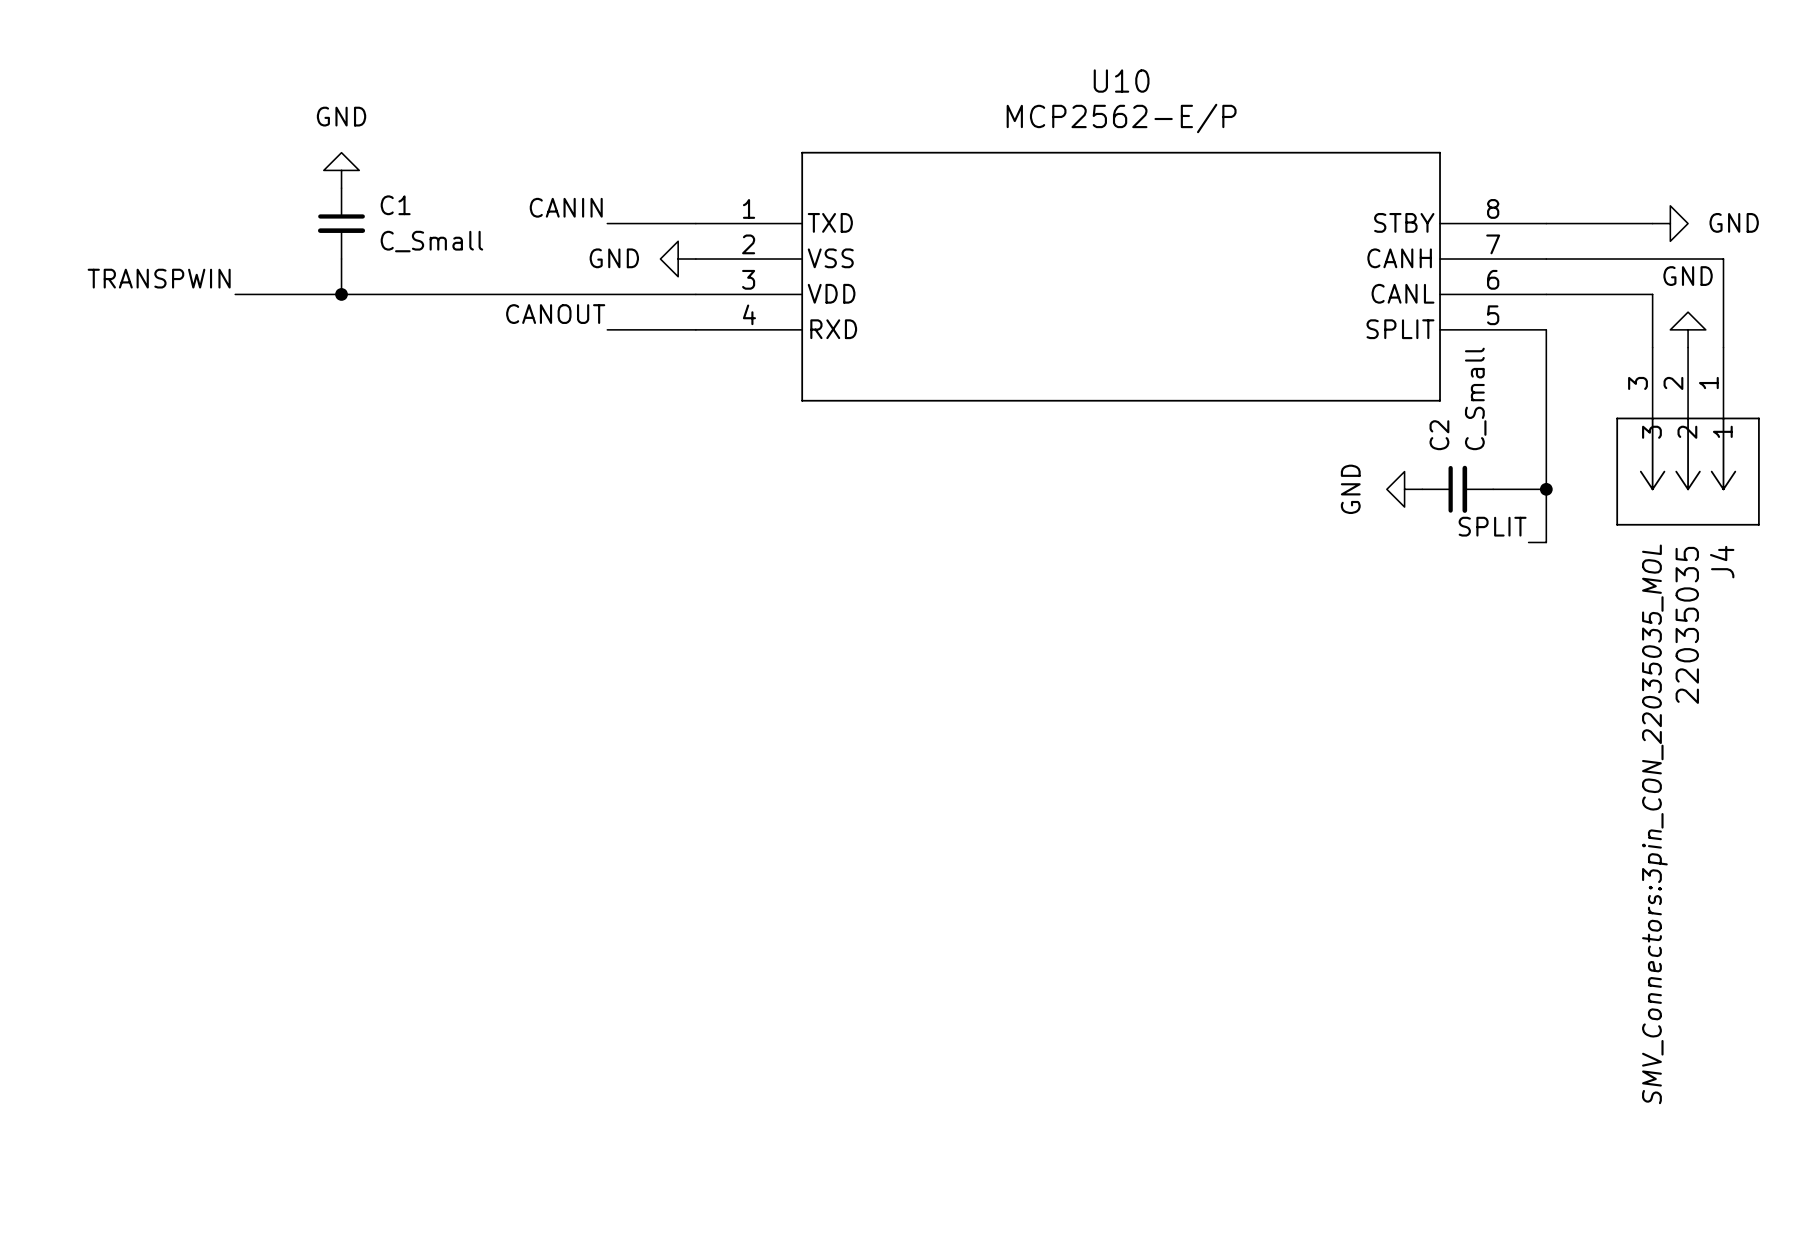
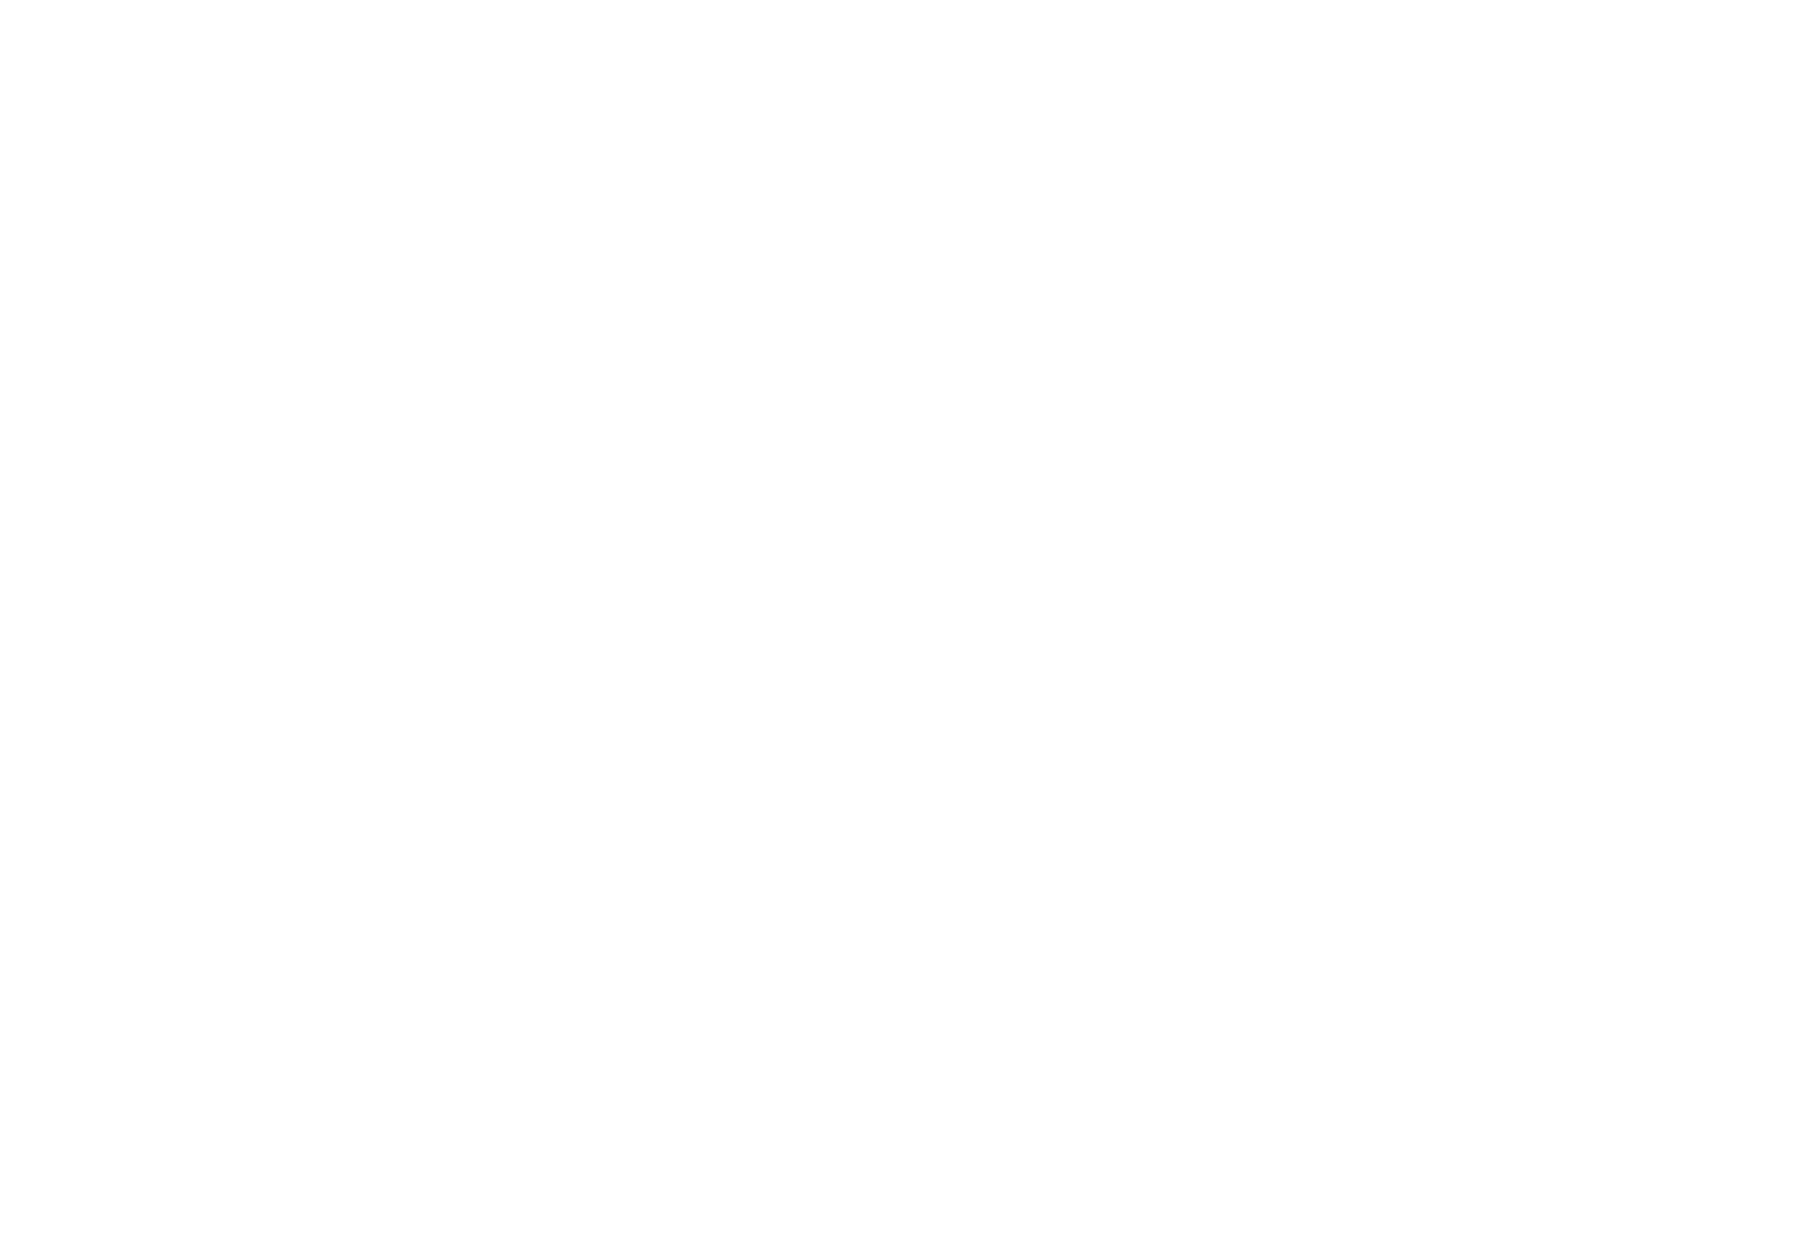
power symbol: GND (341, 170) -> none
label: CANIN (566, 207) -> none
C1: C_Small (341, 223) -> none
wire: (607, 223) (695, 223) -> none
wire: (1546, 223) (1652, 223) -> none
power symbol: GND (1670, 223) -> none
wire: (341, 259) (341, 294) -> none
power symbol: GND (678, 259) -> none
wire: (1546, 259) (1723, 259) (1723, 347) -> none
U10: MCP2562-E/P (1121, 276) -> none
label: TRANSPWIN (159, 278) -> none
wire: (235, 294) (695, 294) -> none
junction: (341, 294) -> none
wire: (1546, 294) (1652, 294) (1652, 347) -> none
label: CANOUT (555, 314) -> none
wire: (607, 329) (695, 329) -> none
wire: (1546, 329) (1546, 542) (1528, 542) -> none
power symbol: GND (1688, 329) -> none
J4: 22035035 (1688, 436) -> none
power symbol: GND (1404, 489) -> none
C2: C_Small (1457, 489) -> none
wire: (1493, 489) (1546, 489) -> none
junction: (1546, 489) -> none
label: SPLIT (1492, 526) -> none

